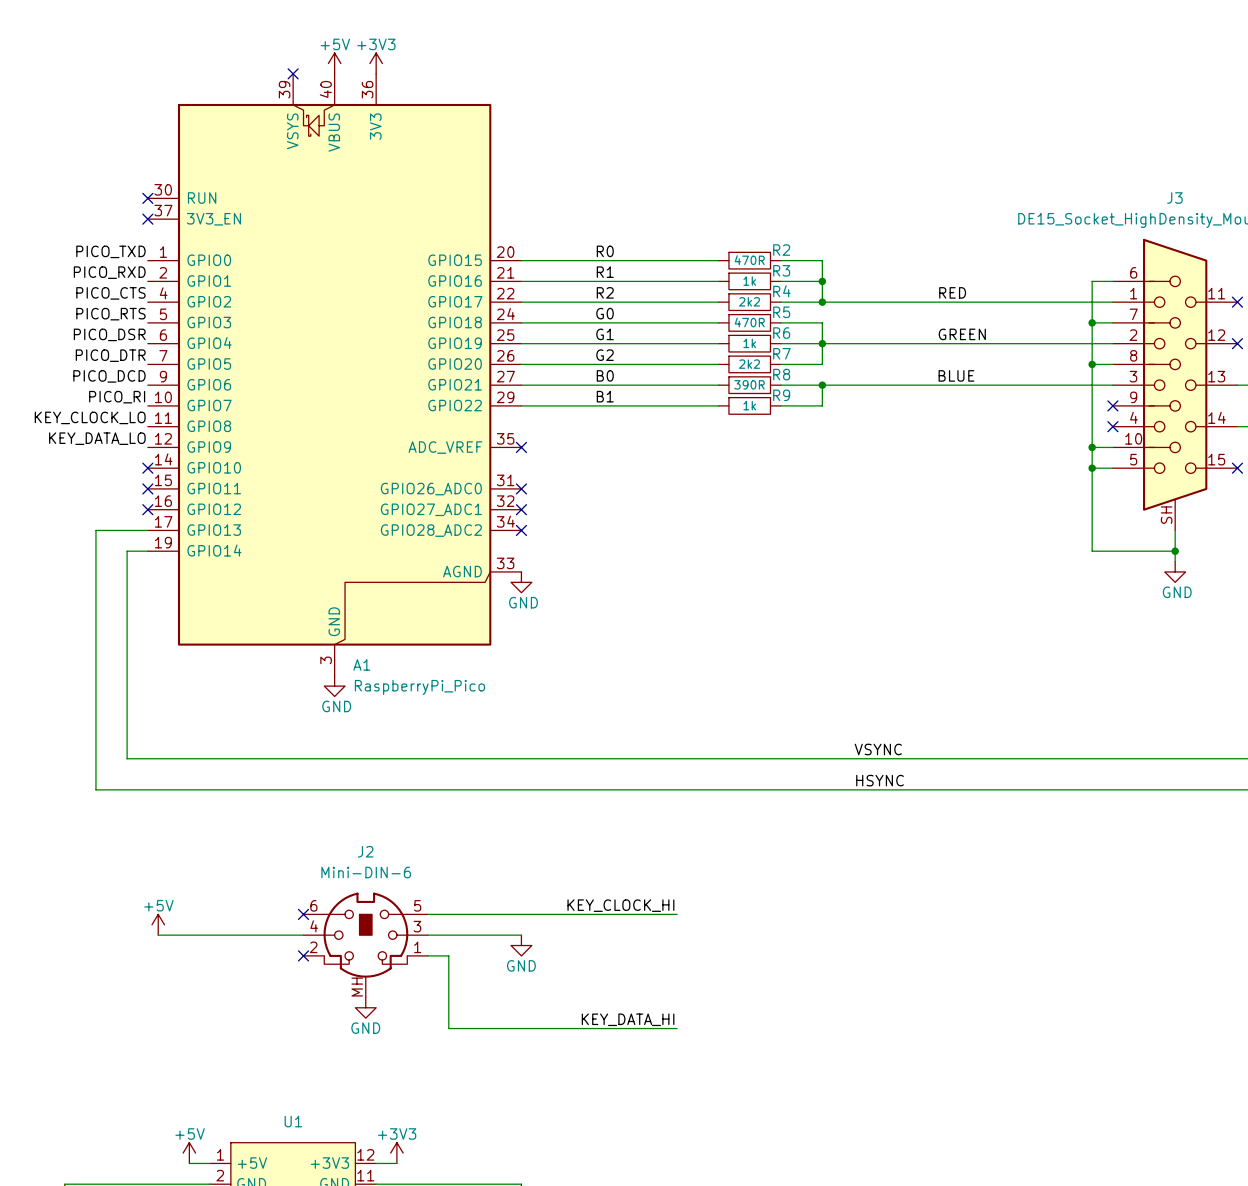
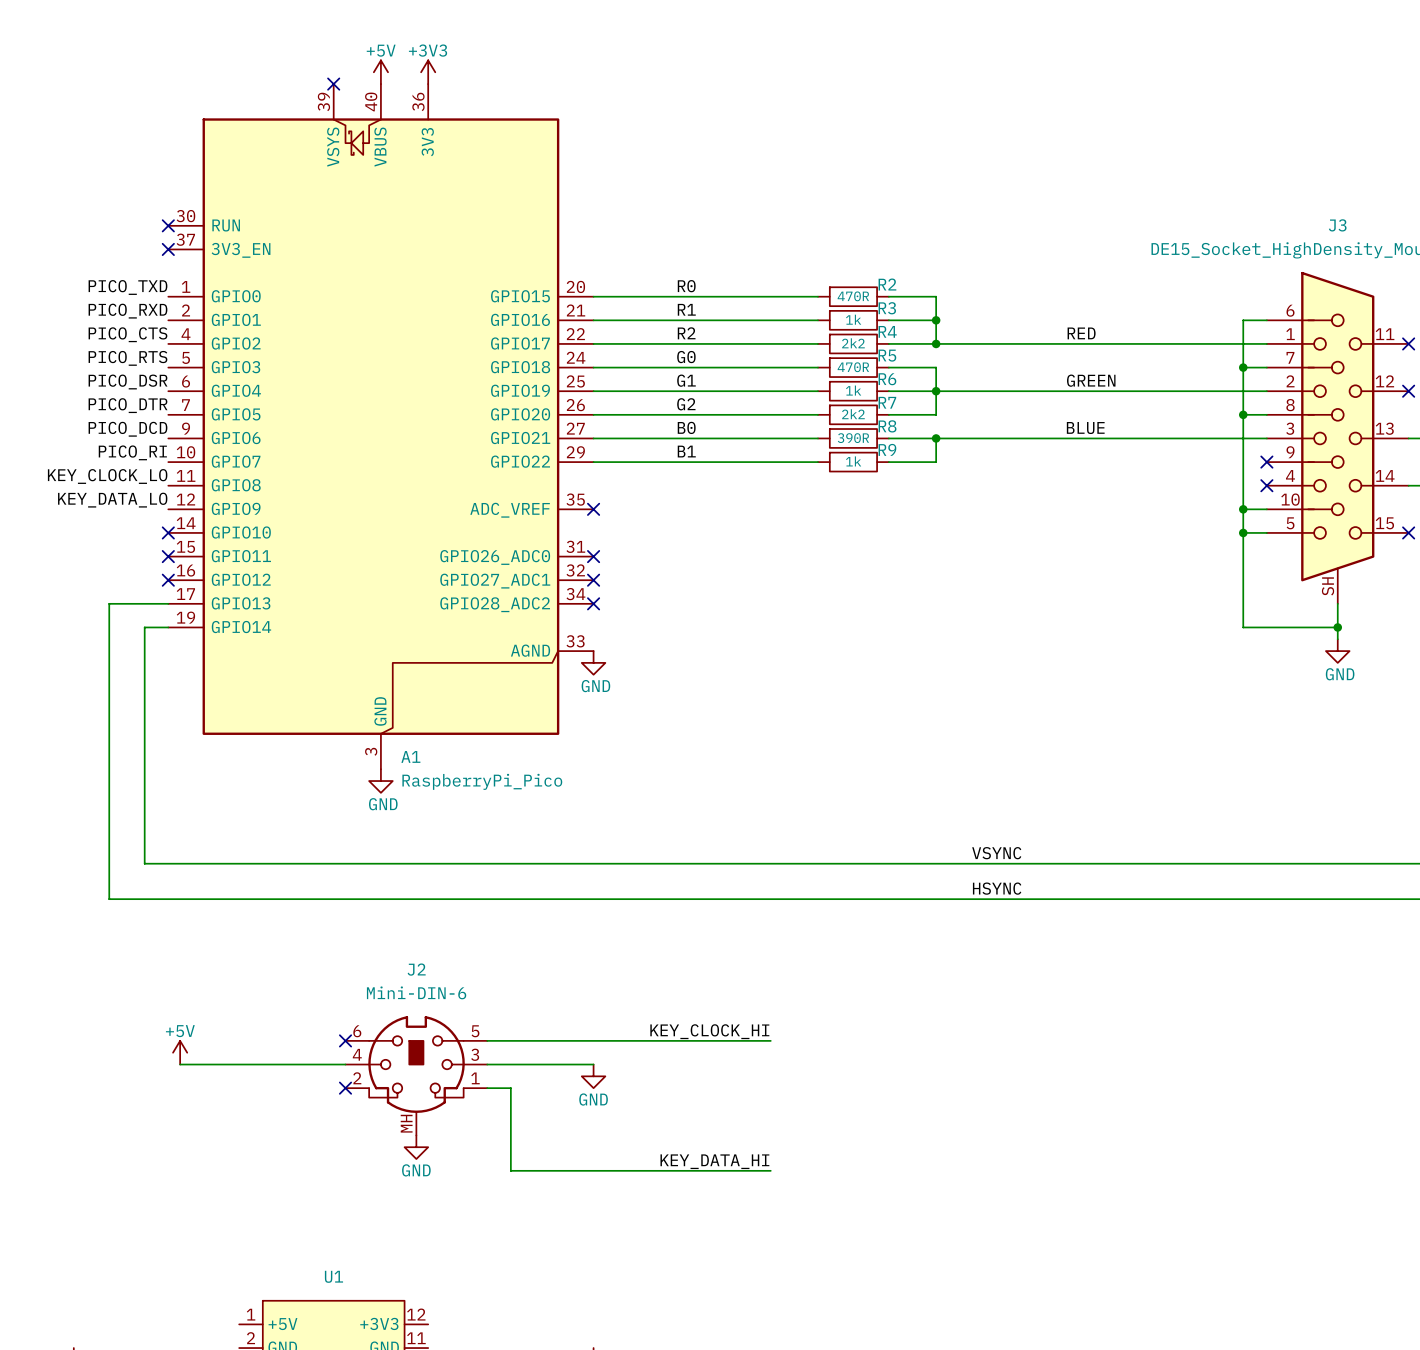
power symbol: +5V (189, 1153) -> none
power symbol: +3V3 (396, 1153) -> none
wire: (189, 1163) (210, 1163) -> none
wire: (376, 1163) (396, 1163) -> none
wire: (64, 1184) (210, 1184) -> none
wire: (376, 1184) (521, 1184) -> none

